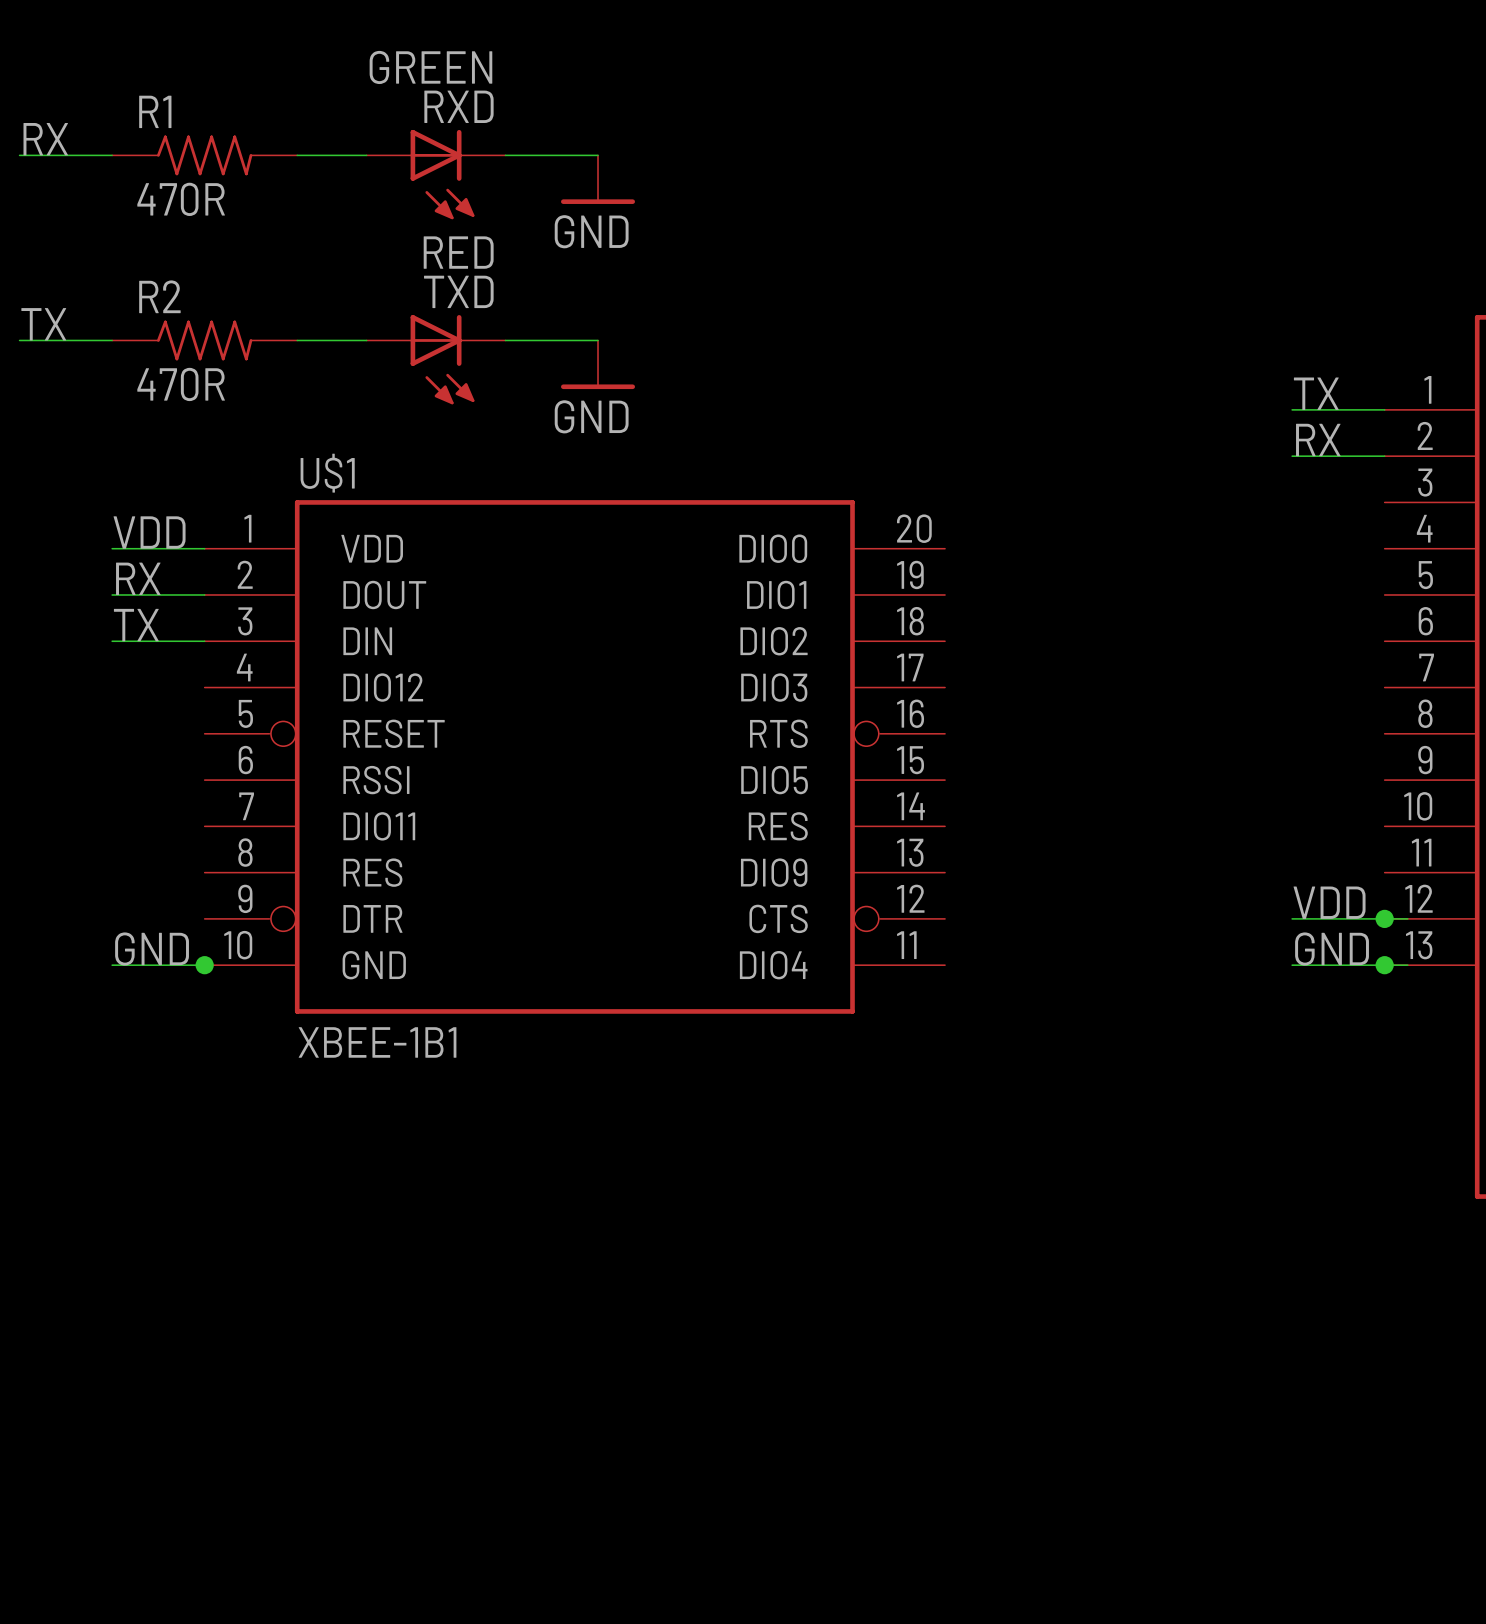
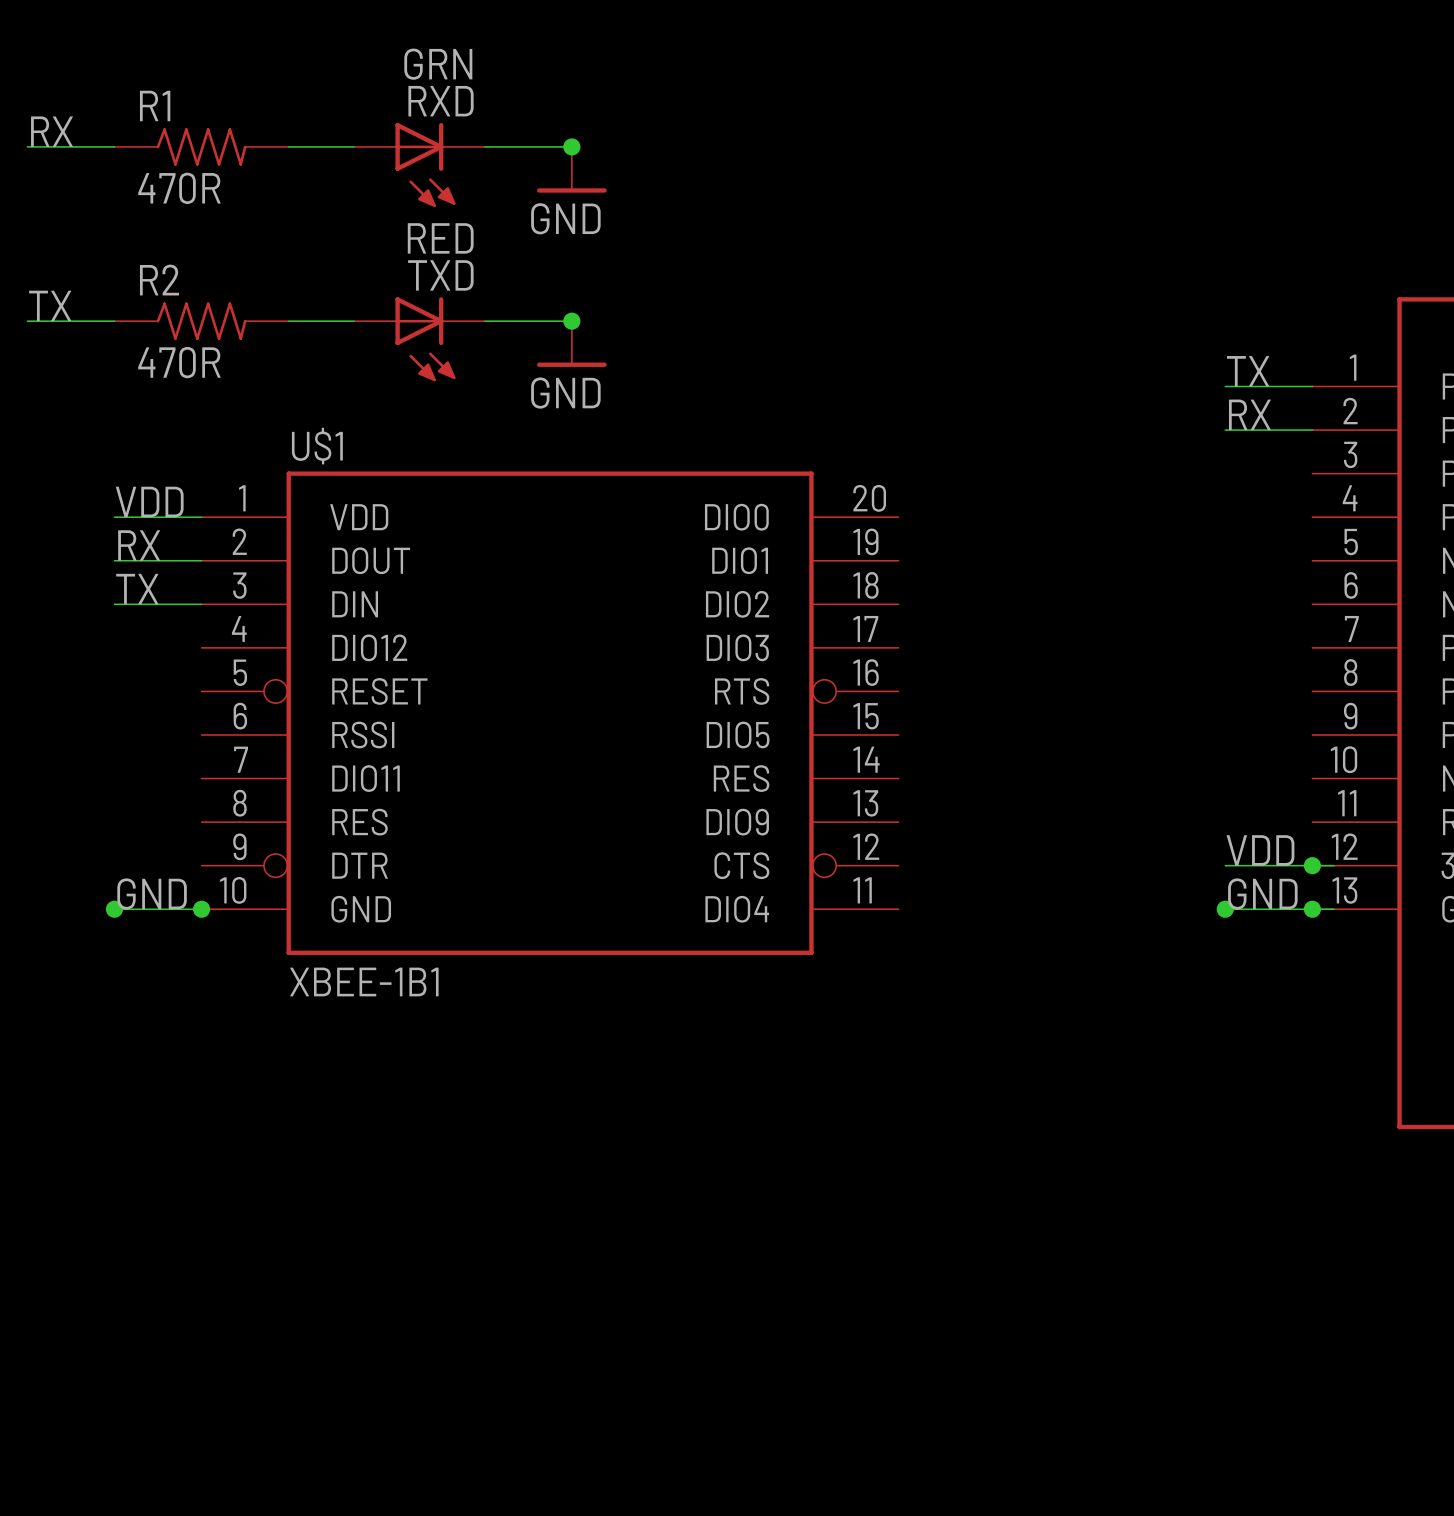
RXD value: GREEN (430, 67) -> GRN (438, 64)
junction: none -> (571, 146)
junction: none -> (571, 321)
junction: none -> (114, 909)
junction: none -> (1225, 909)

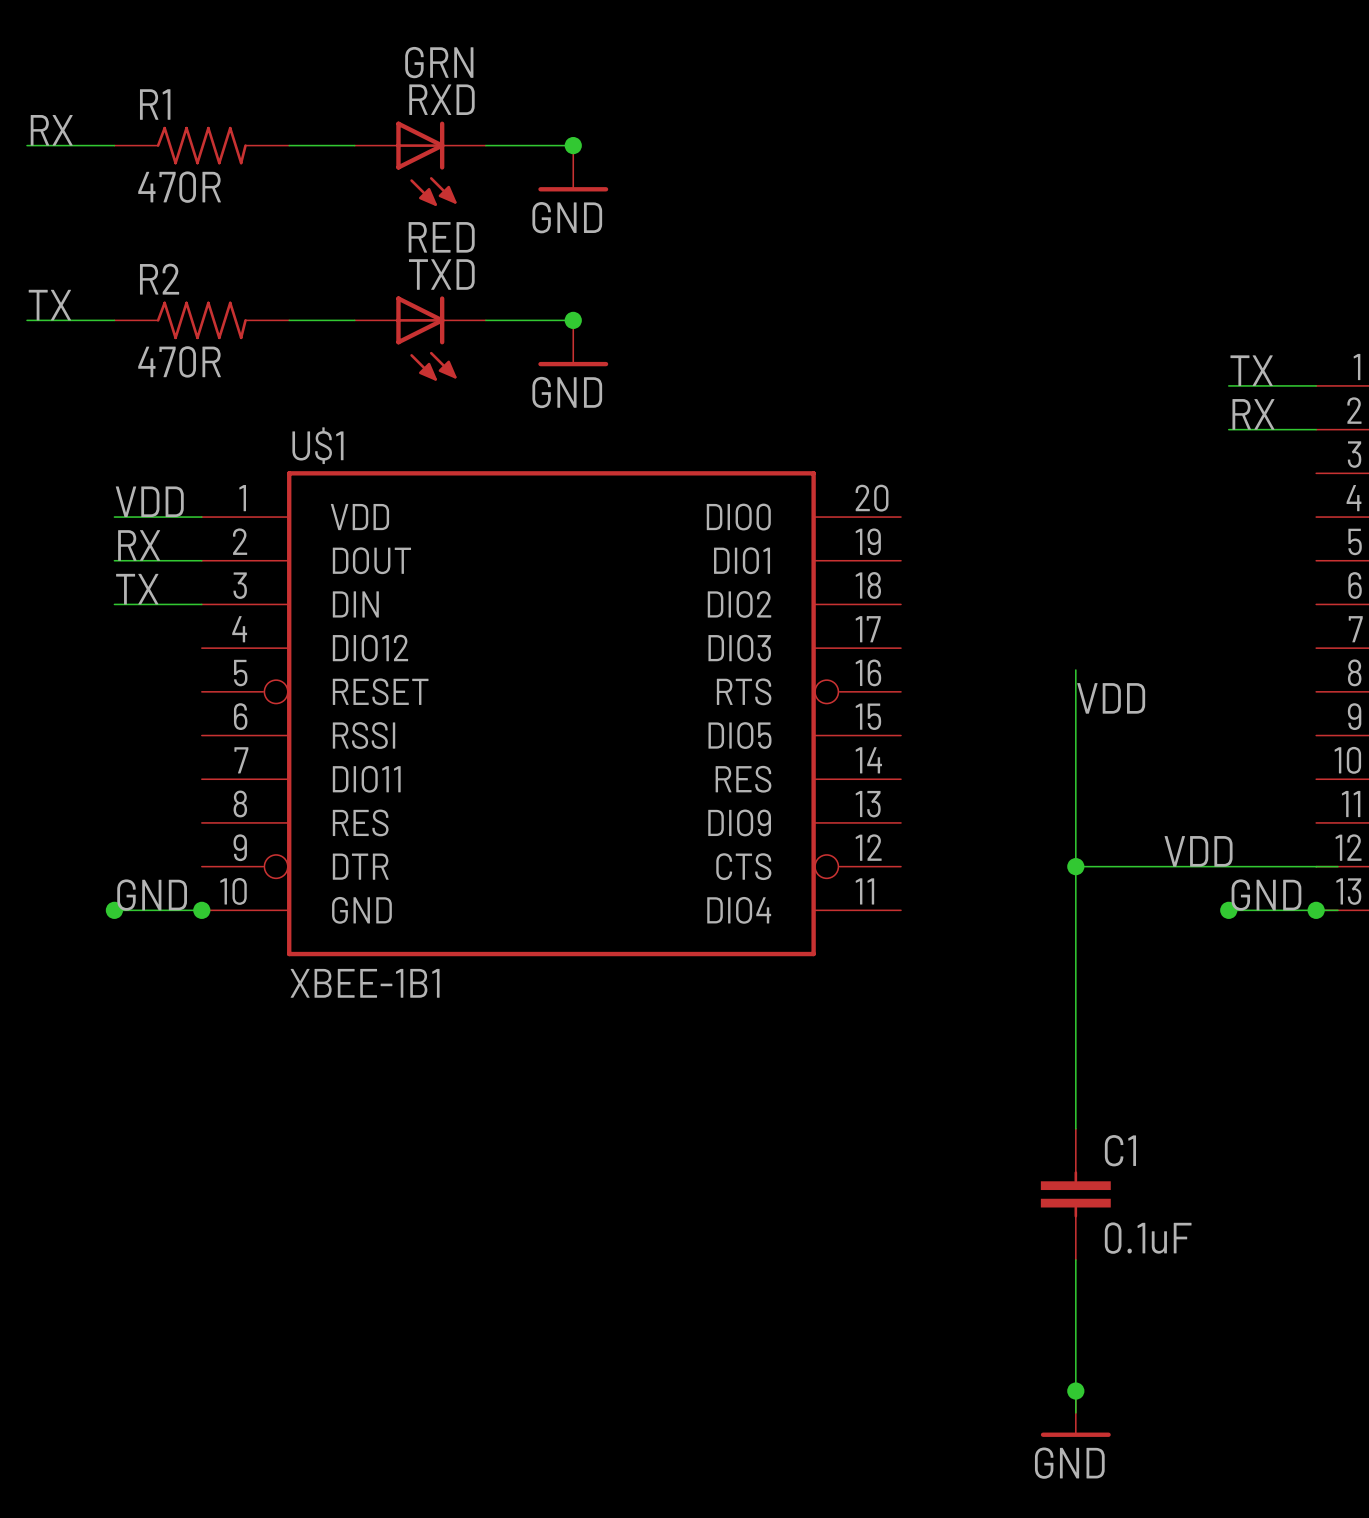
wire: none -> (1075, 669) (1075, 1128)
label: none -> VDD (1111, 698)
label position: VDD (1260, 850) -> VDD (1198, 851)
wire: none -> (1075, 866) (1228, 866)
junction: none -> (1075, 866)
junction: (1312, 865) -> none
C1: none -> 0.1uF (1075, 1194)
wire: none -> (1075, 1259) (1075, 1412)
junction: none -> (1075, 1391)
power symbol: none -> GND (1075, 1413)

